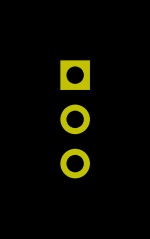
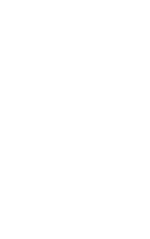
part: (75, 119) -> none

